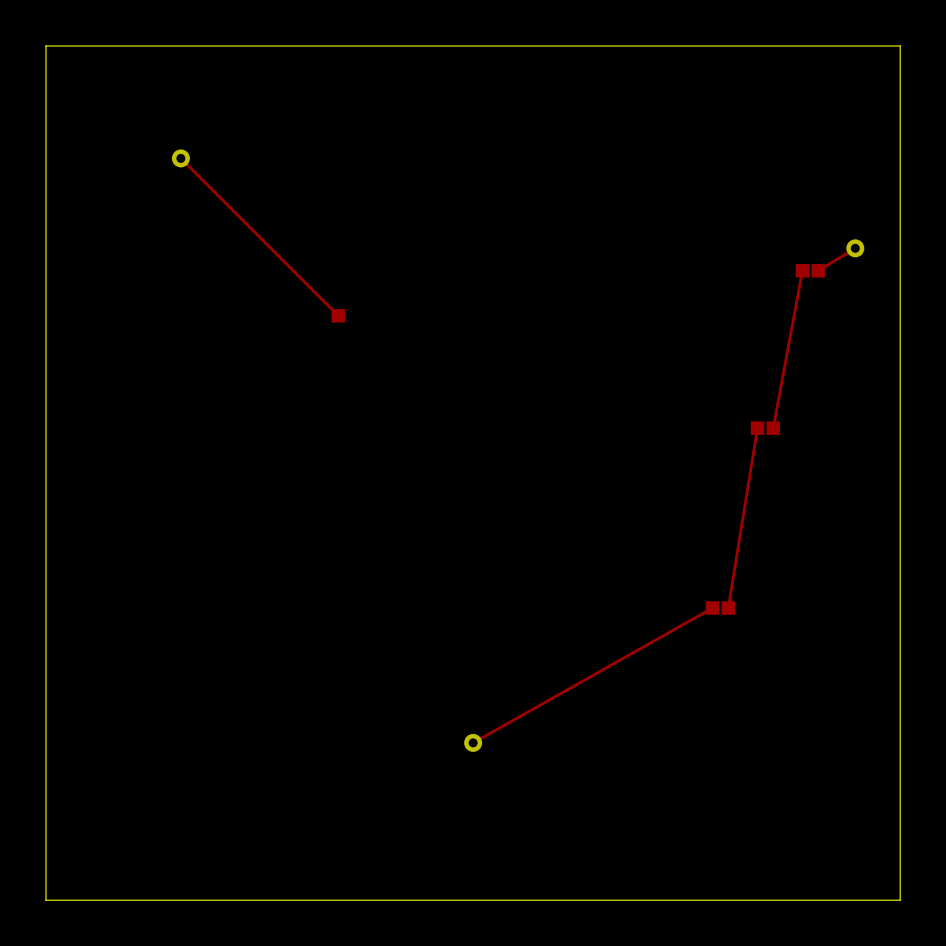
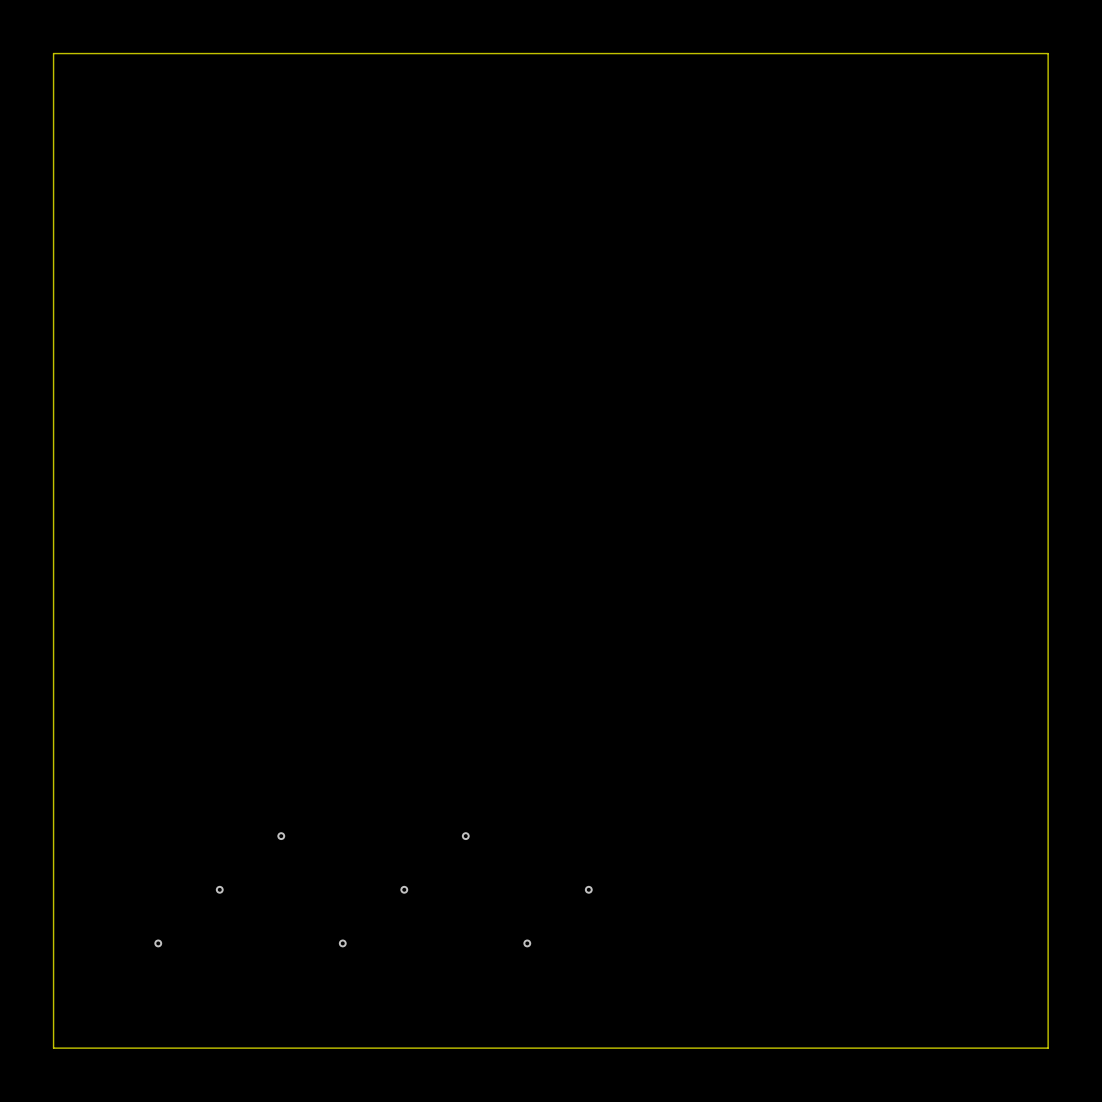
top track: (180, 158) (338, 315) -> none
part: (180, 158) -> none
top track: (855, 248) (818, 270) -> none
part: (855, 248) -> none
top track: (802, 270) (773, 428) -> none
part: (810, 270) -> none
part: (338, 315) -> none
top track: (757, 428) (728, 608) -> none
part: (765, 428) -> none
top track: (712, 608) (473, 742) -> none
part: (720, 608) -> none
via: none -> (281, 836)
via: none -> (465, 836)
part: (473, 742) -> none
via: none -> (219, 889)
via: none -> (404, 889)
via: none -> (588, 889)
via: none -> (158, 943)
via: none -> (342, 943)
via: none -> (527, 943)

